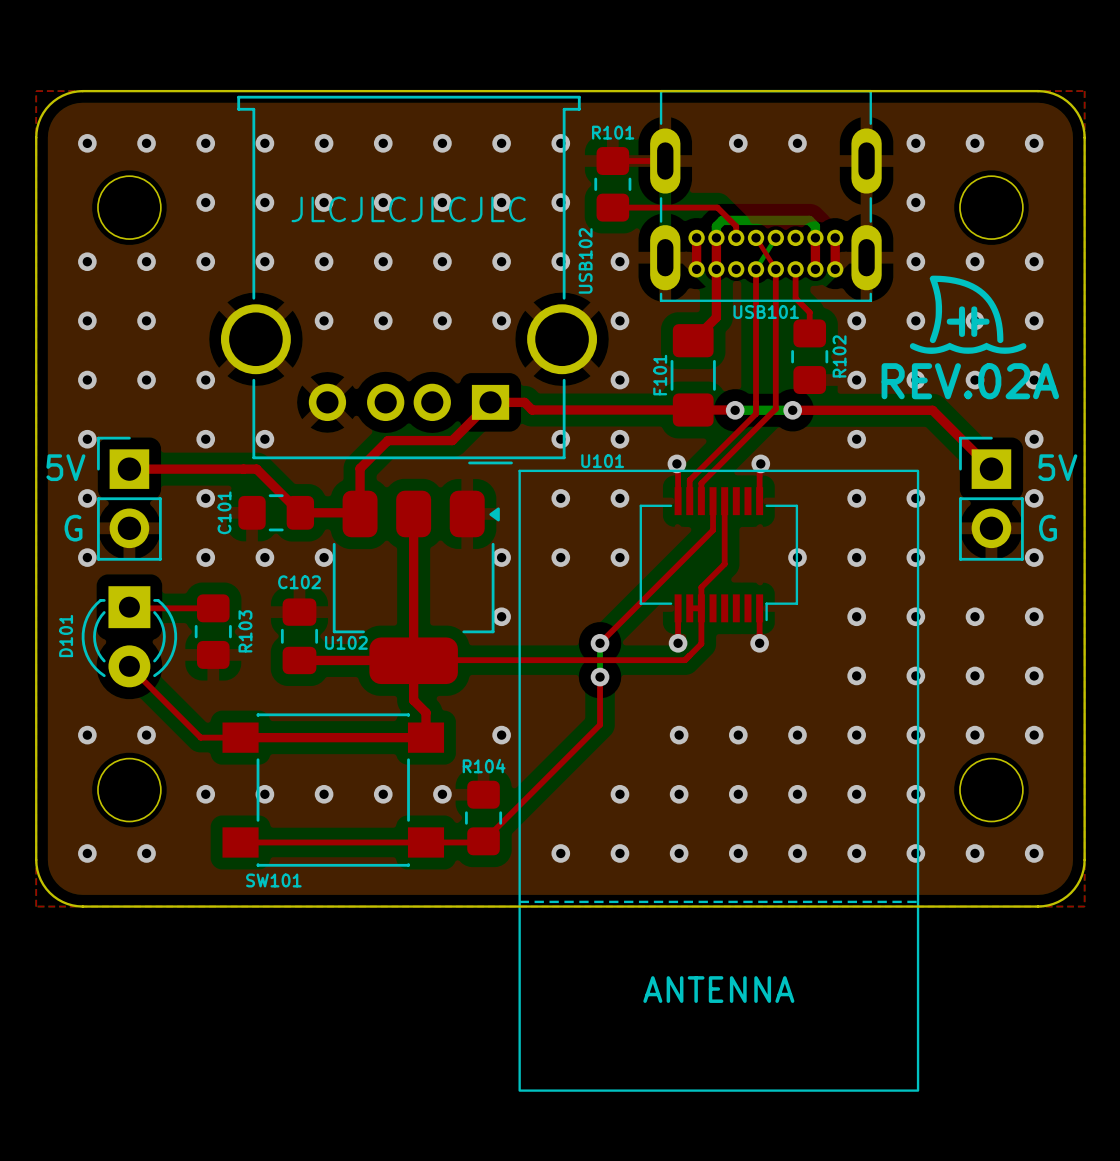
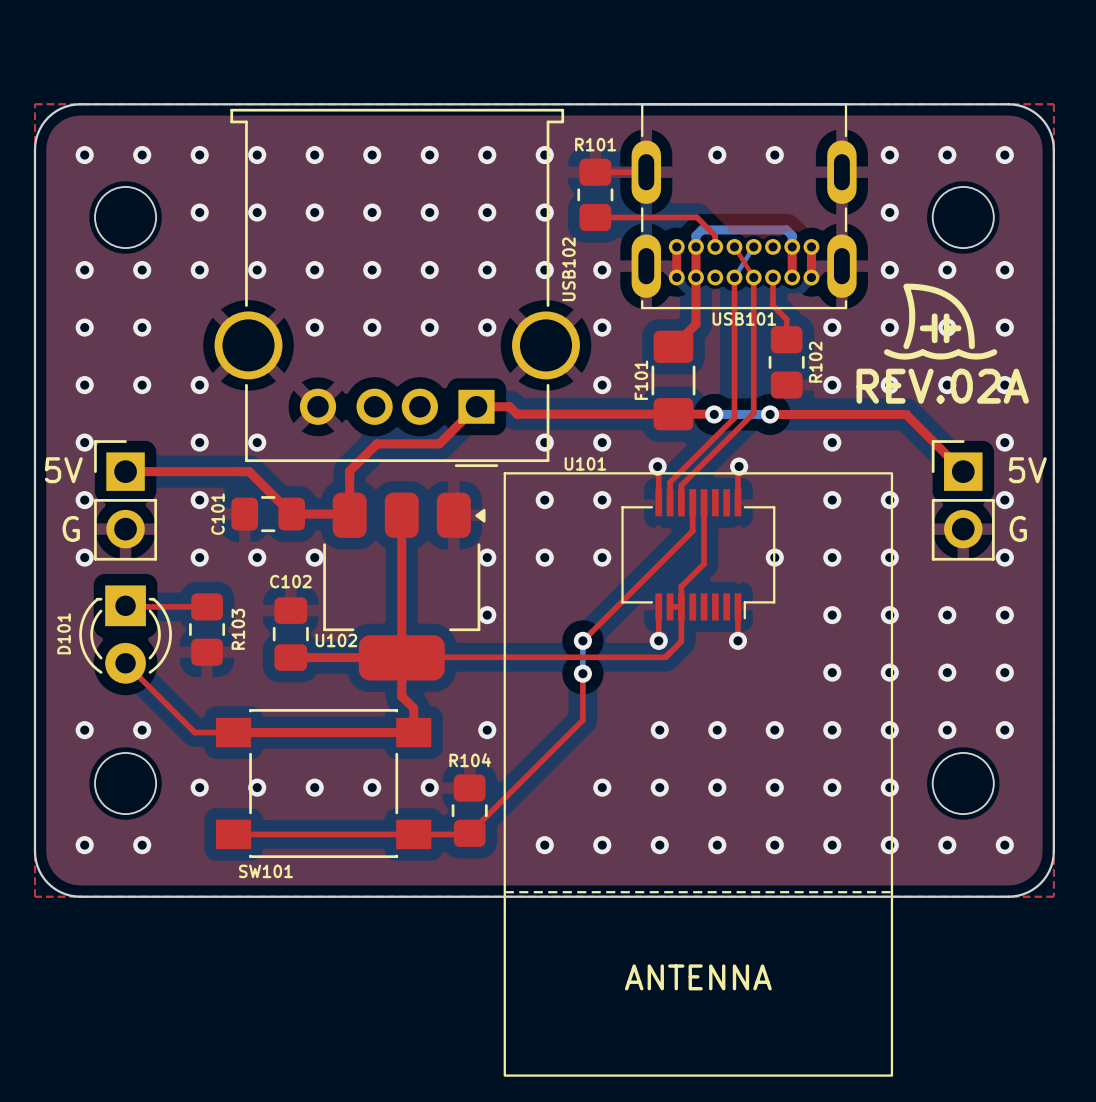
text: JLCJLCJLCJLC (408, 209) -> none

